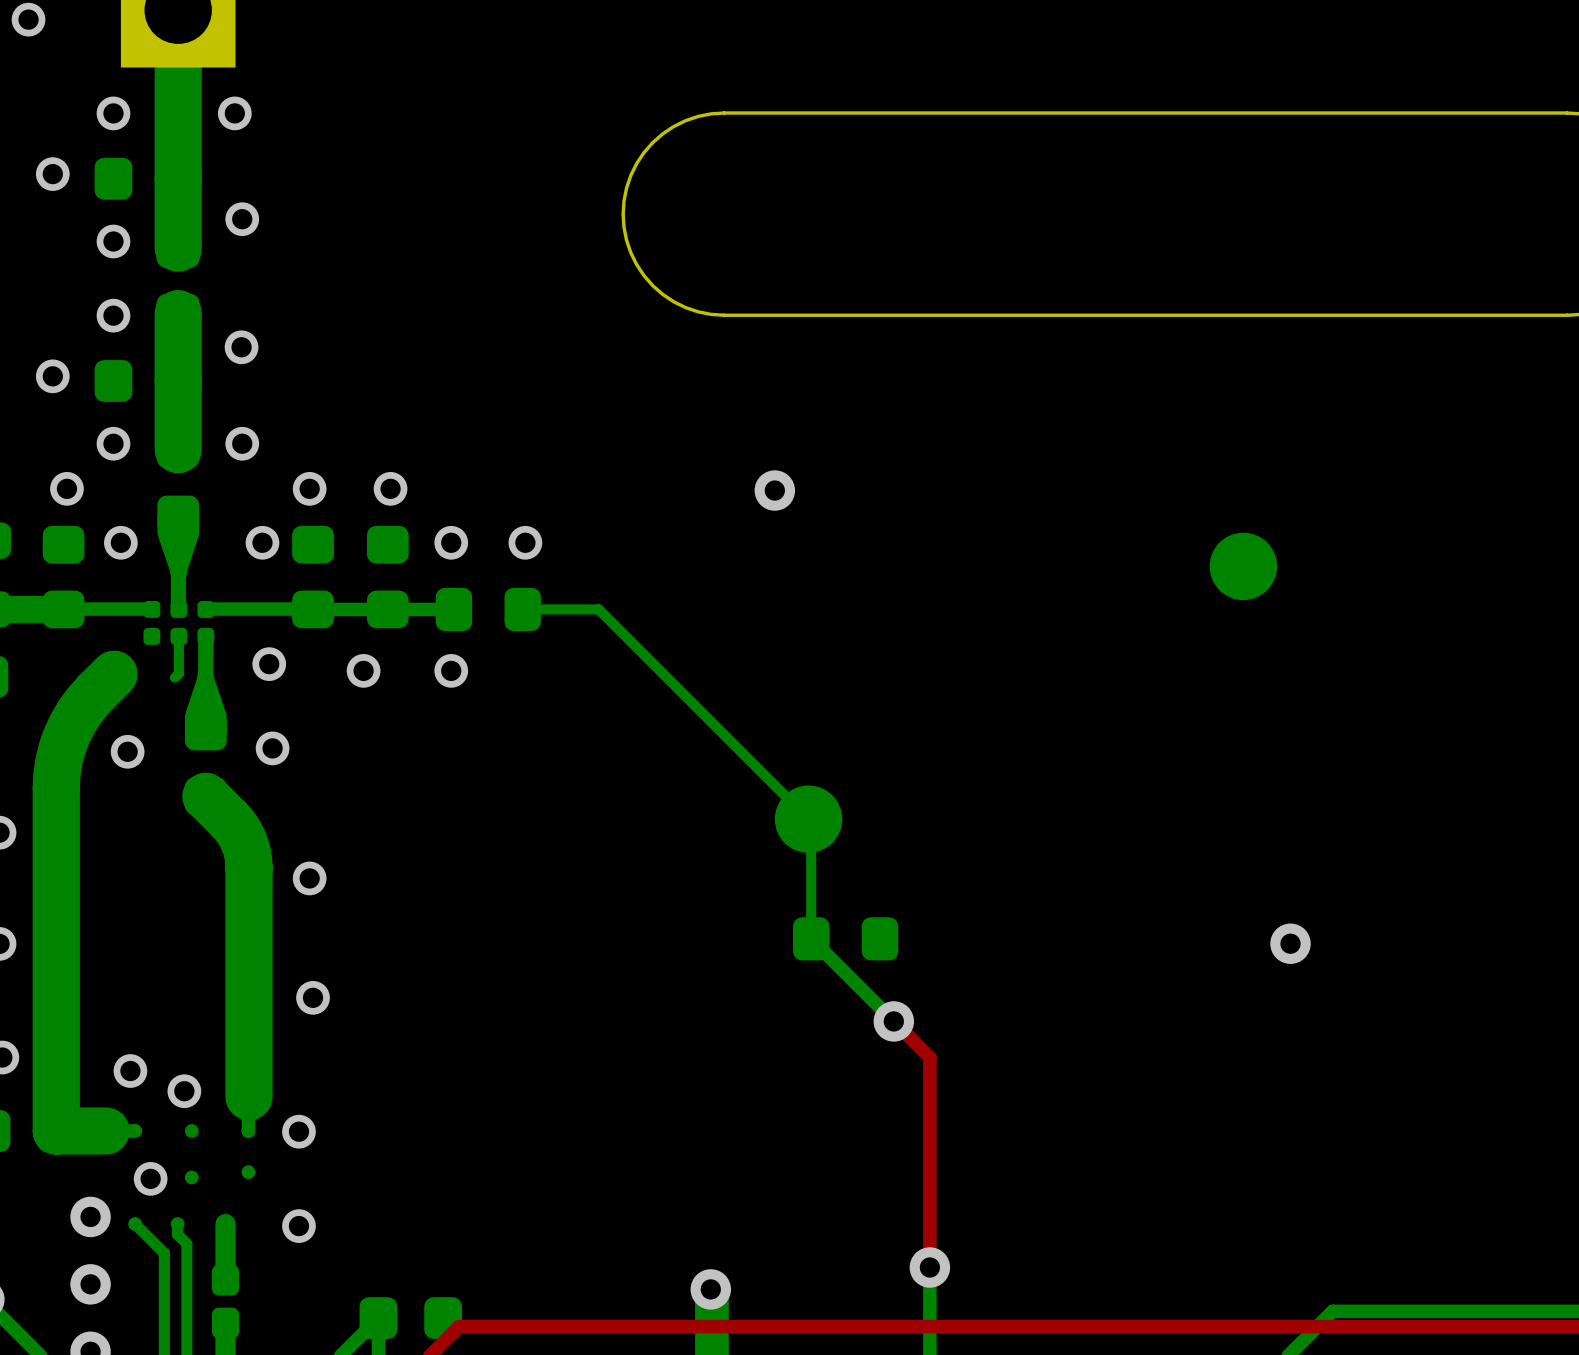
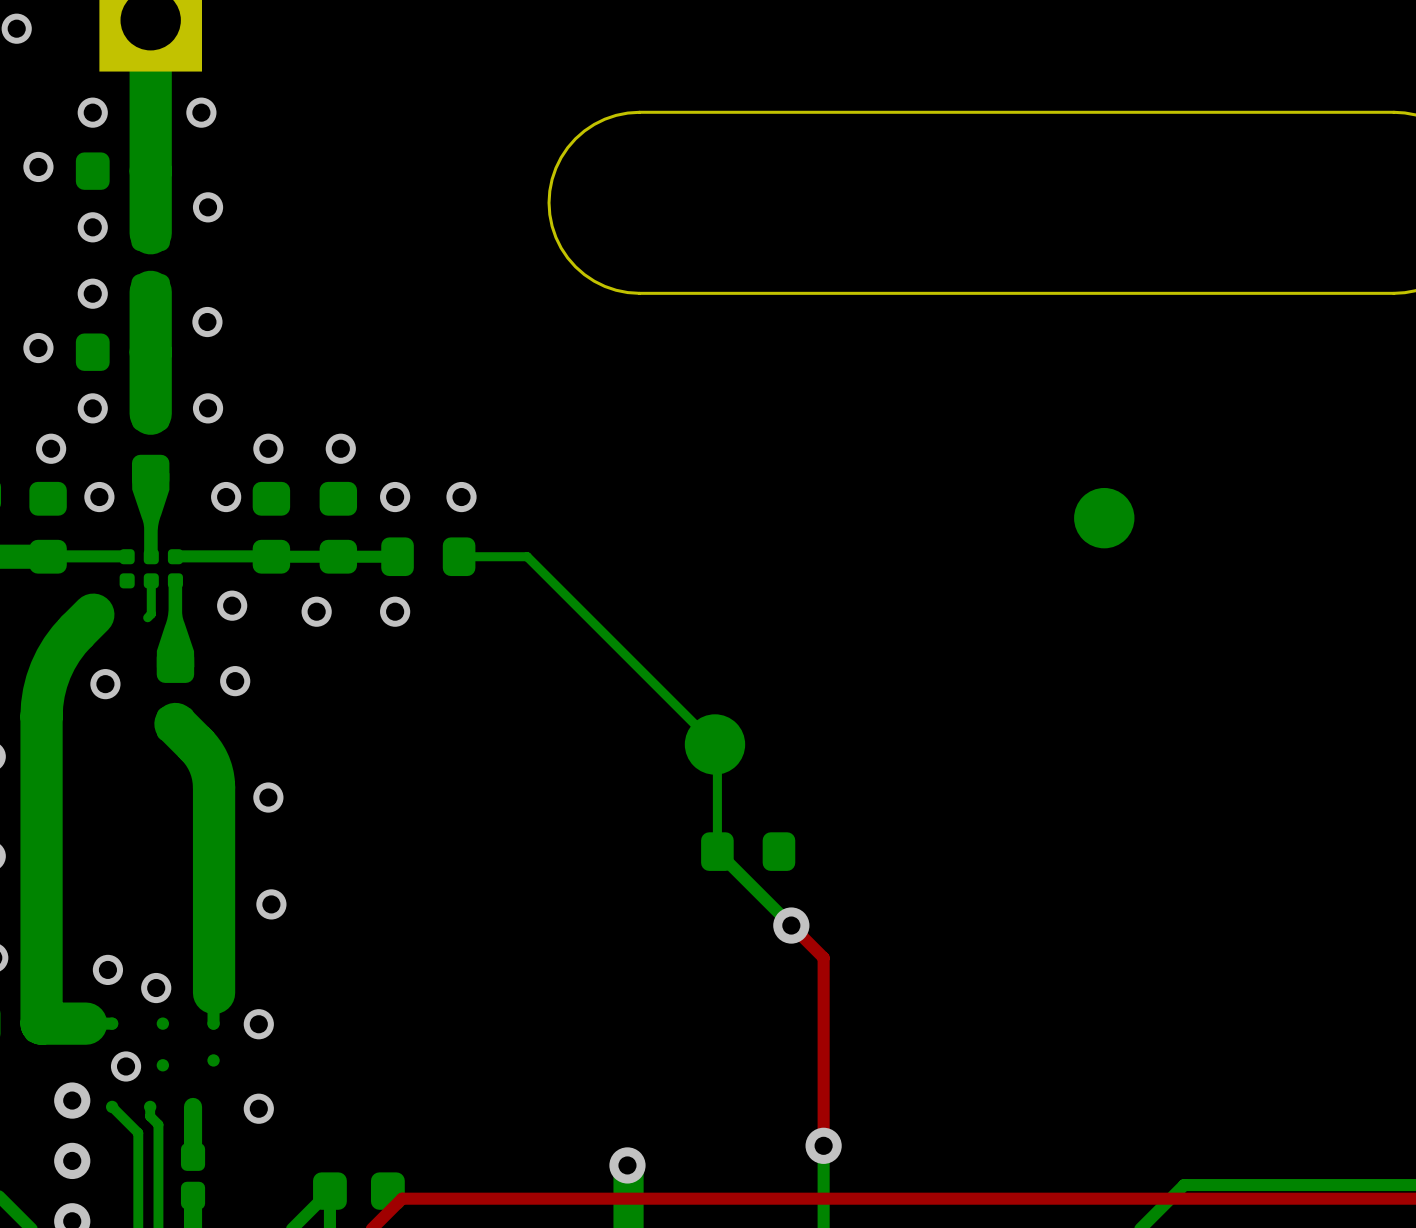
via: (774, 490) -> none
via: (1290, 943) -> none

